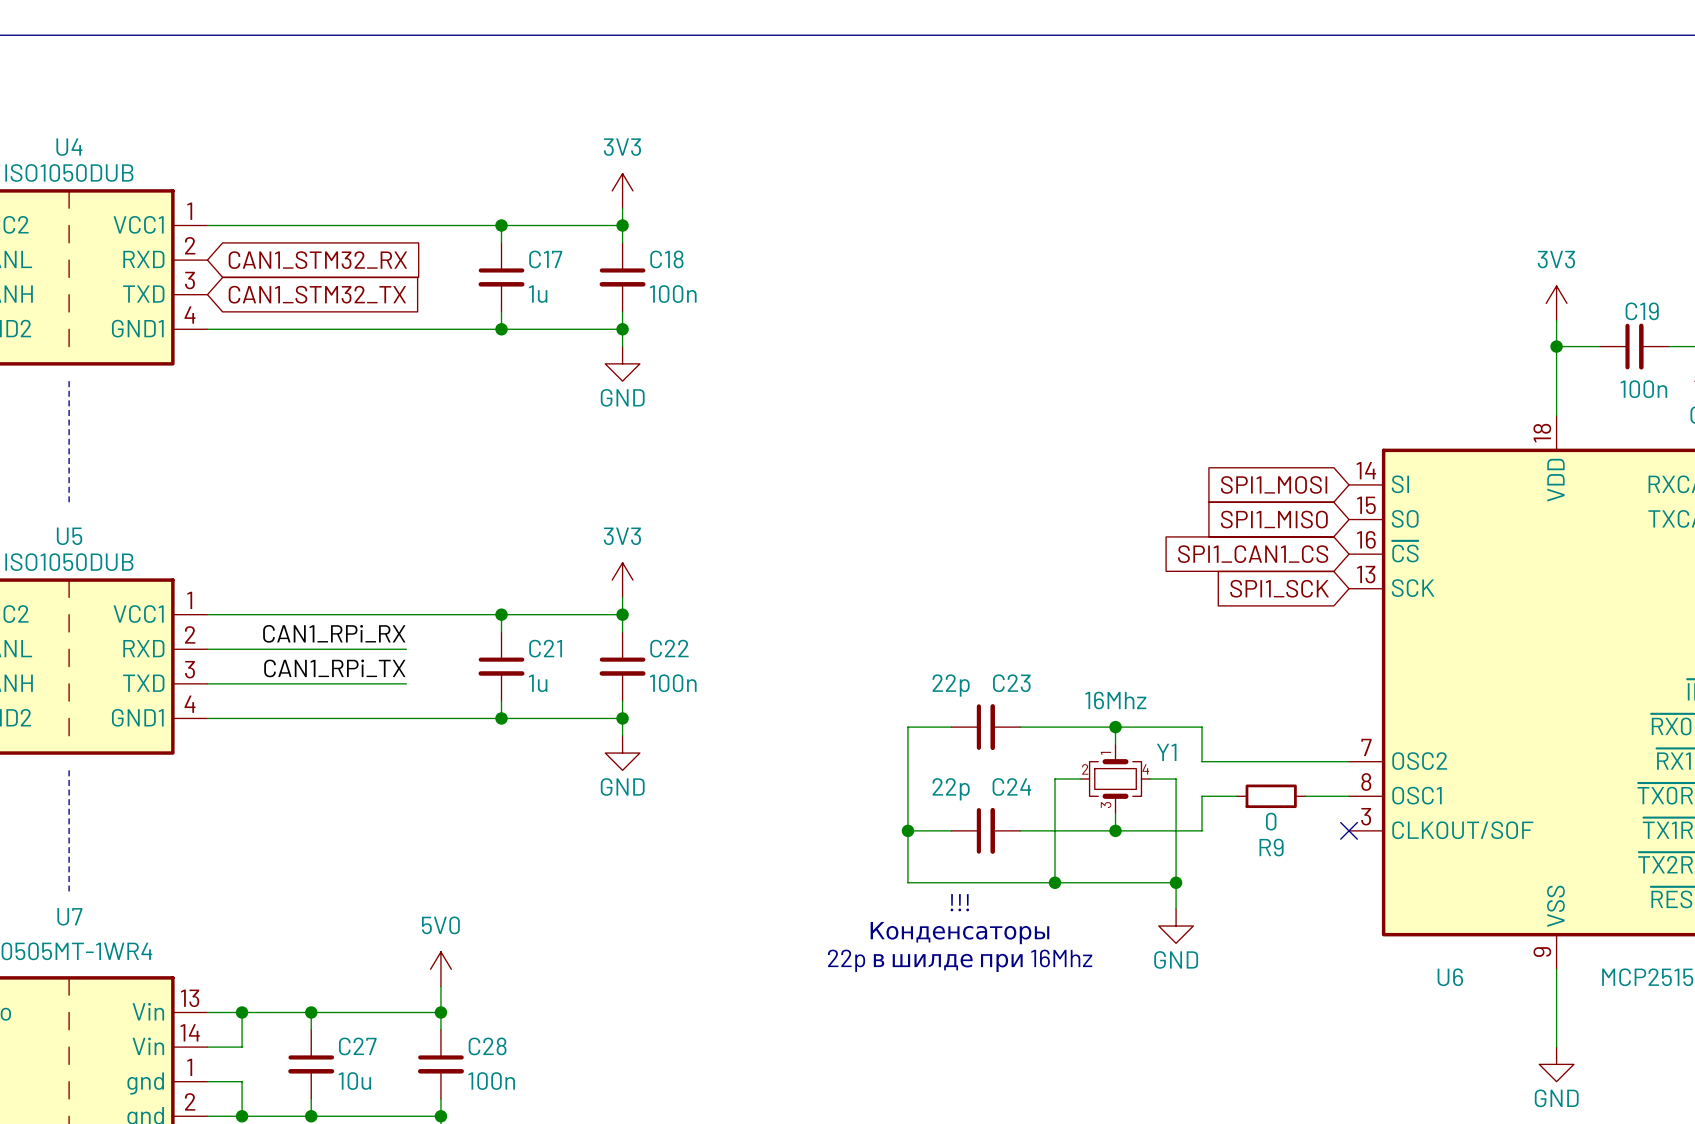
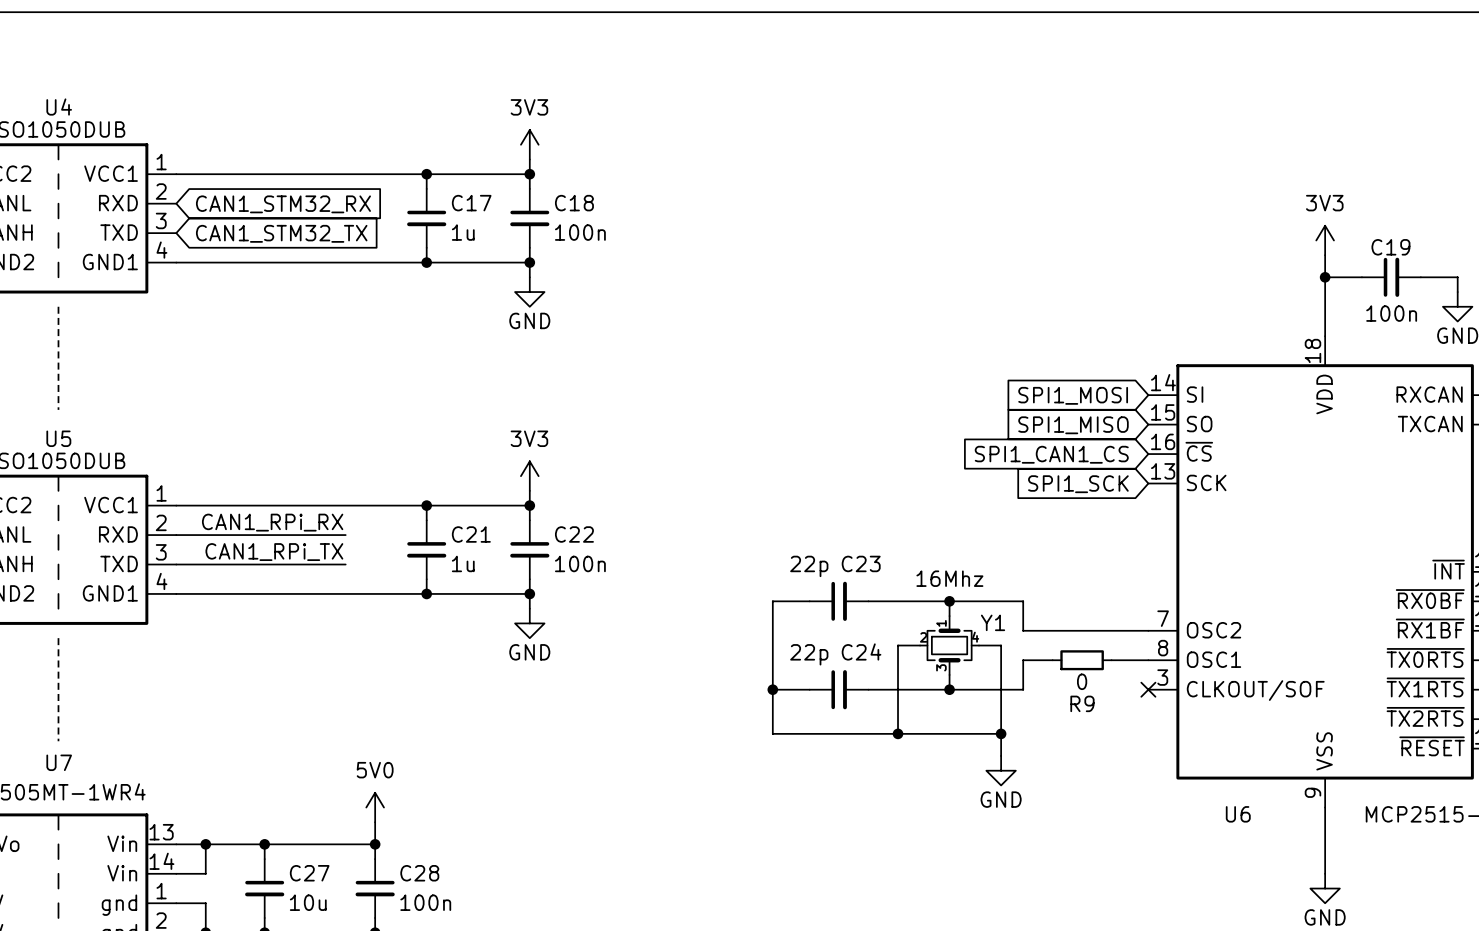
text: !!! (959, 902) -> none
text: Конденсаторы (959, 933) -> none
text: 22p в шилде при 16Mhz (960, 960) -> none

